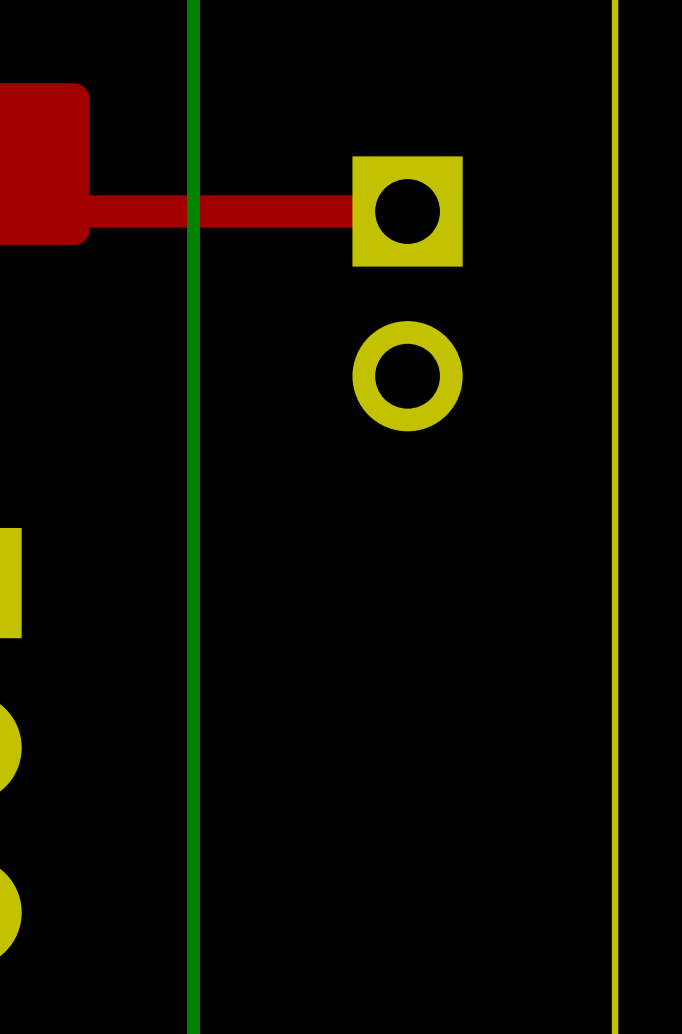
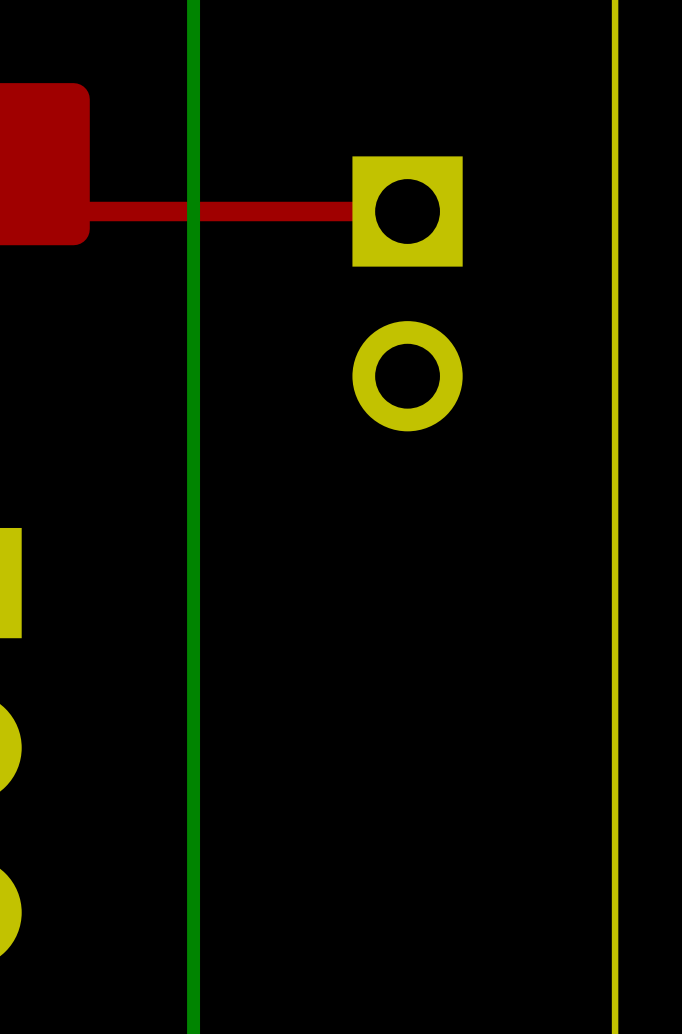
top track width: thick (31, 164) (78, 211) (407, 211) -> thin (31, 164) (78, 211) (407, 211)

